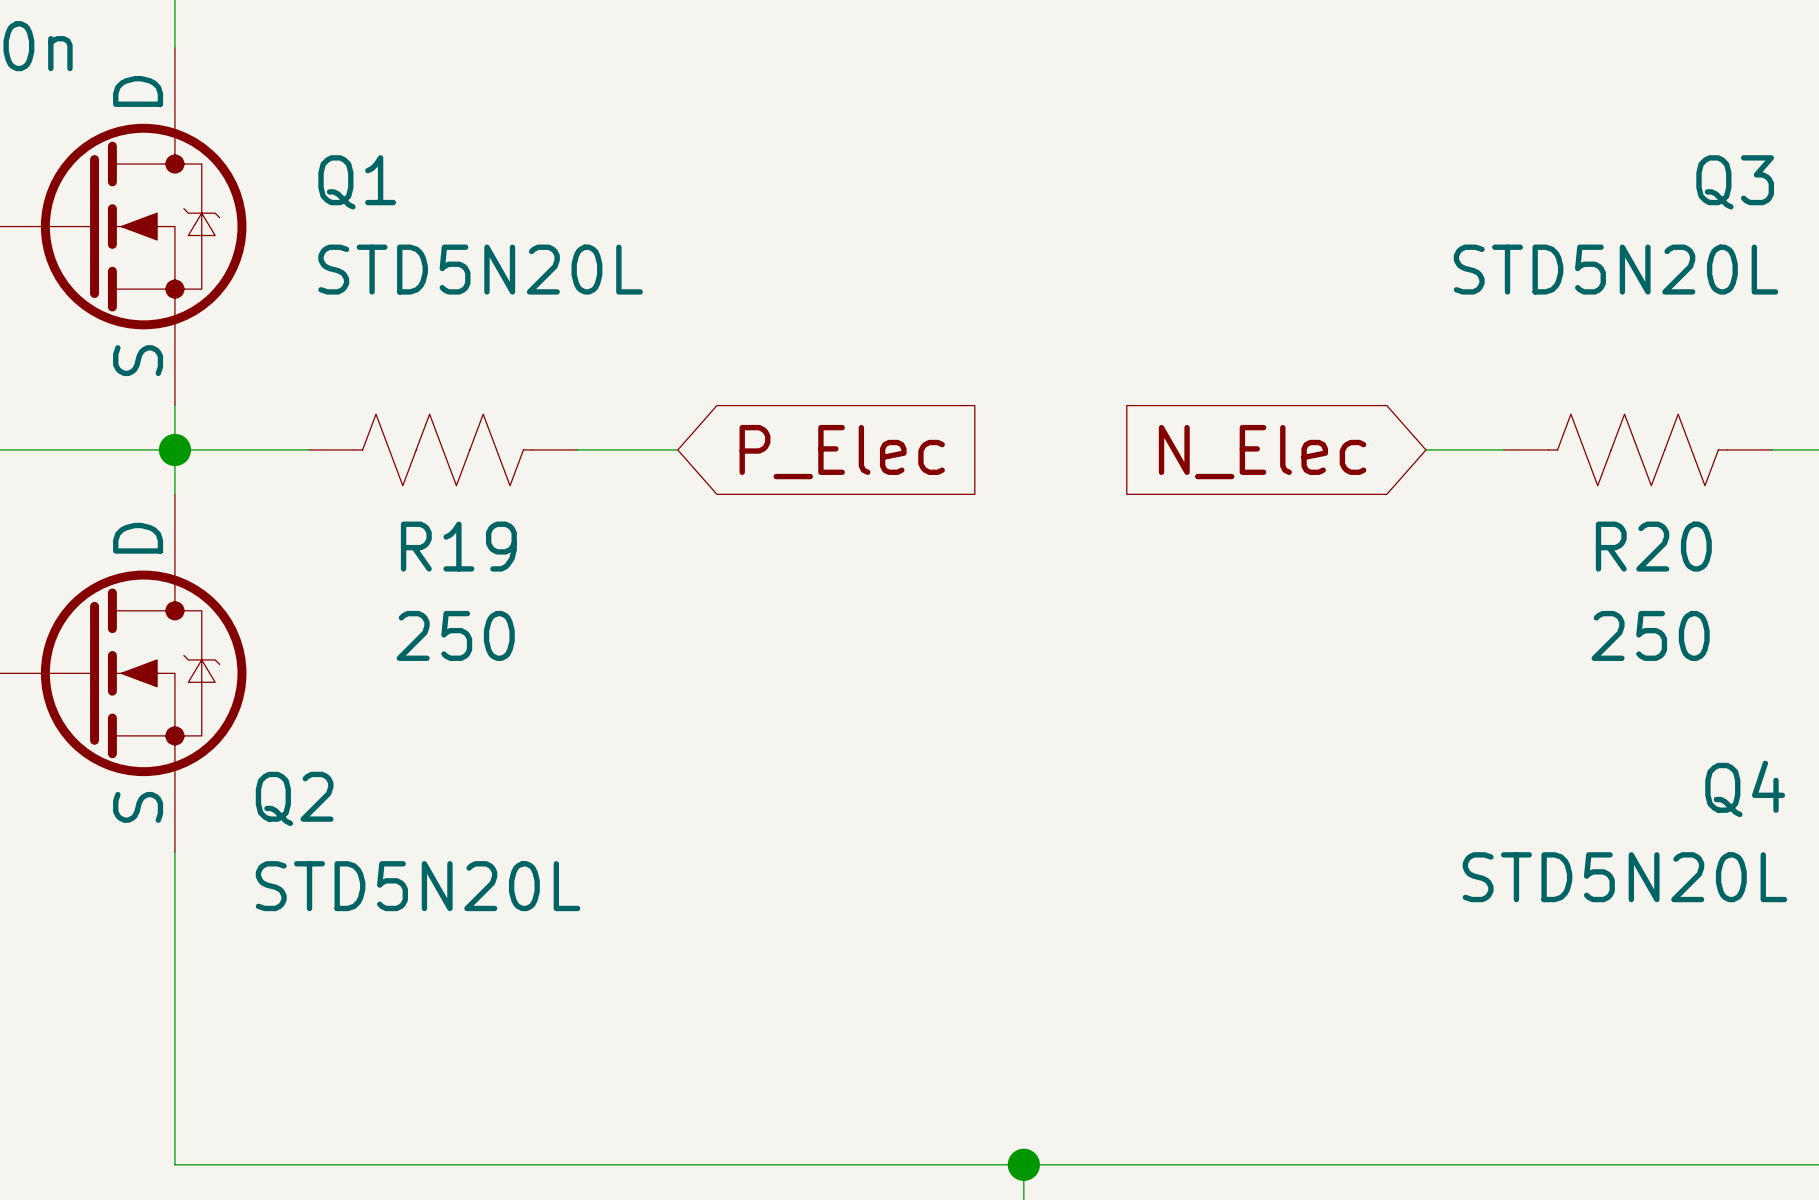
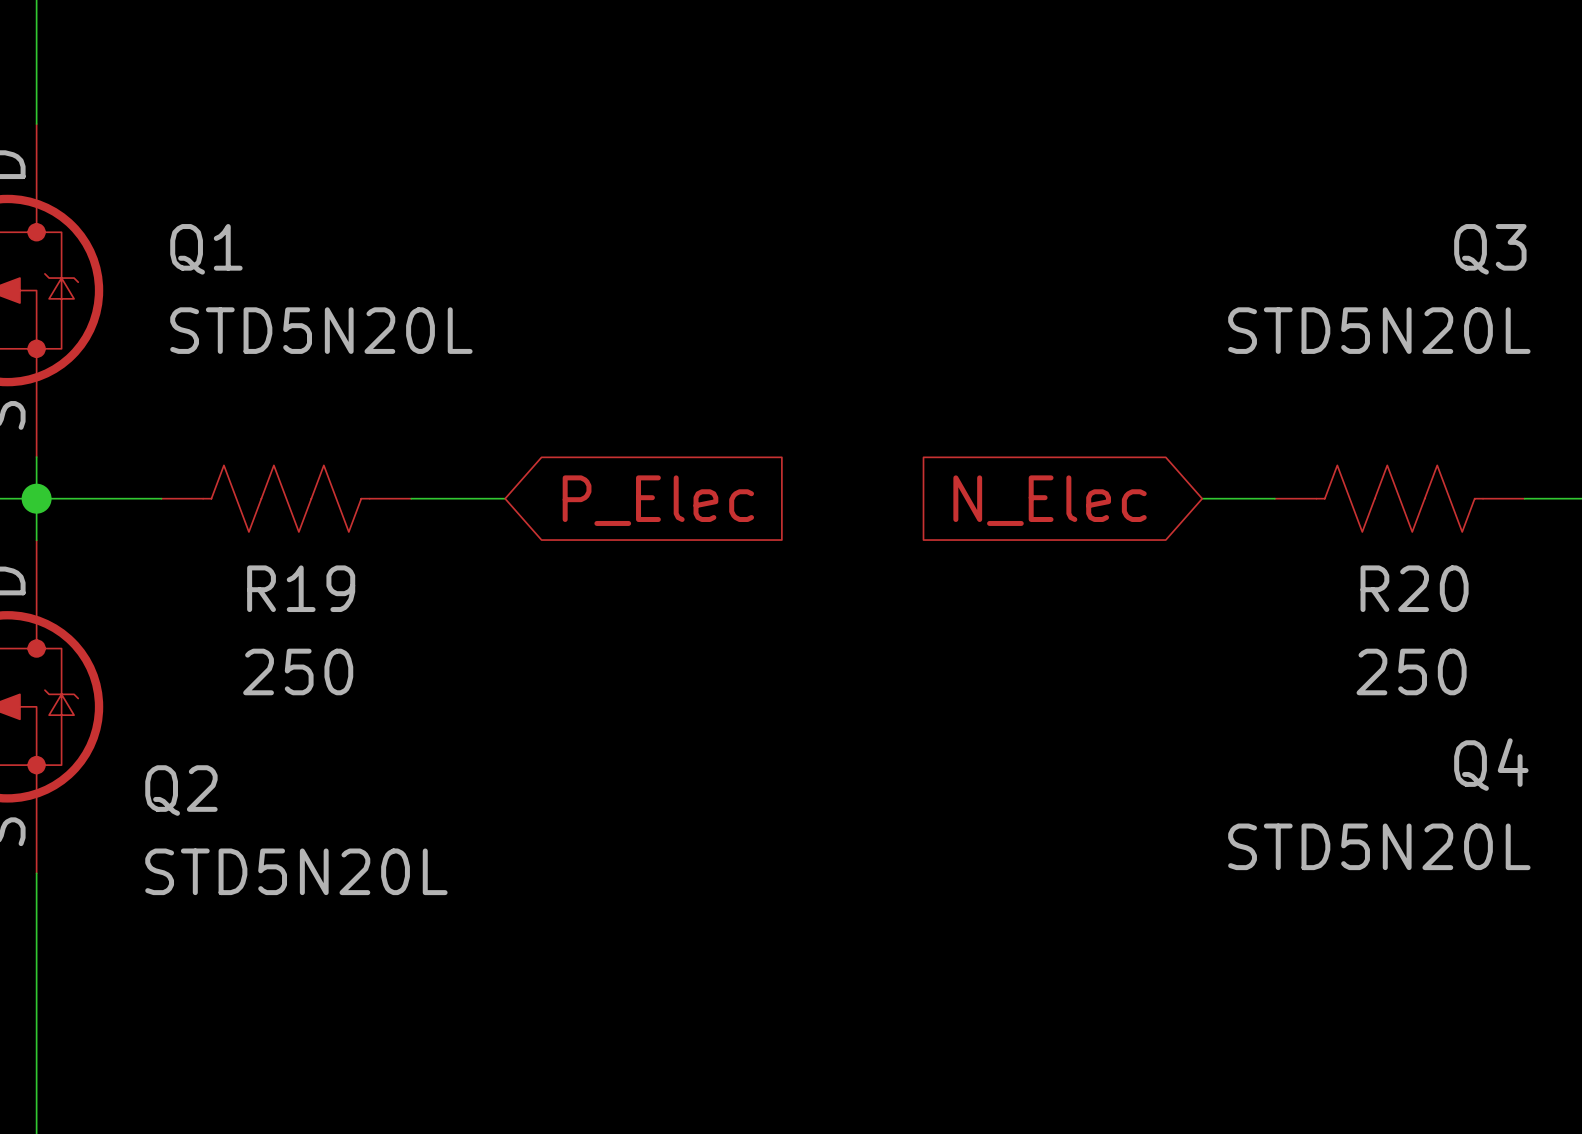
Q4 name position: Q4 (1745, 788) -> Q4 (1491, 764)
Q2 name position: Q2 (294, 798) -> Q2 (181, 790)
Q4 value position: STD5N20L (1624, 877) -> STD5N20L (1379, 846)
Q2 value position: STD5N20L (418, 886) -> STD5N20L (296, 871)

